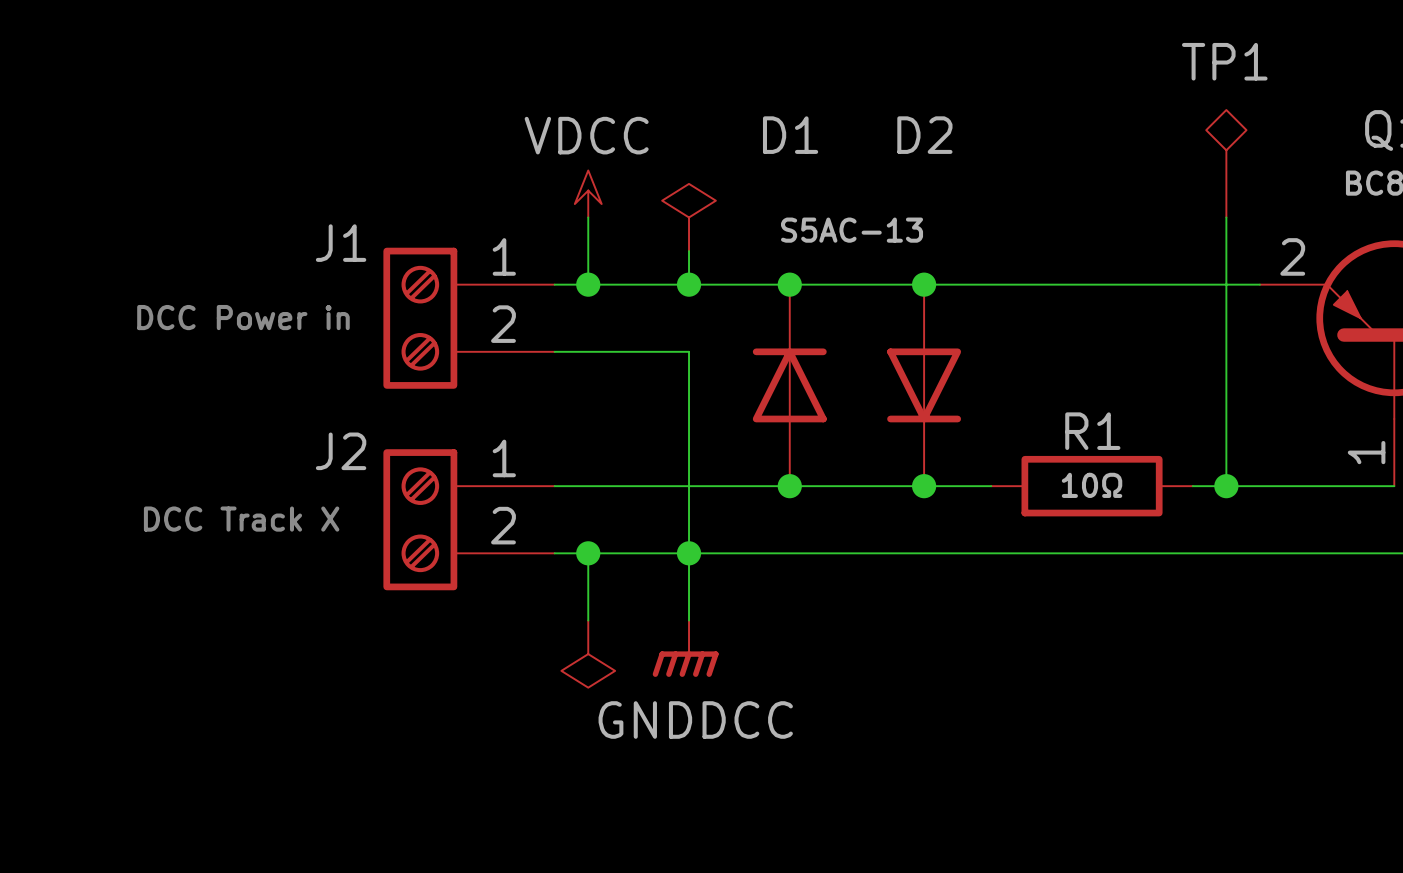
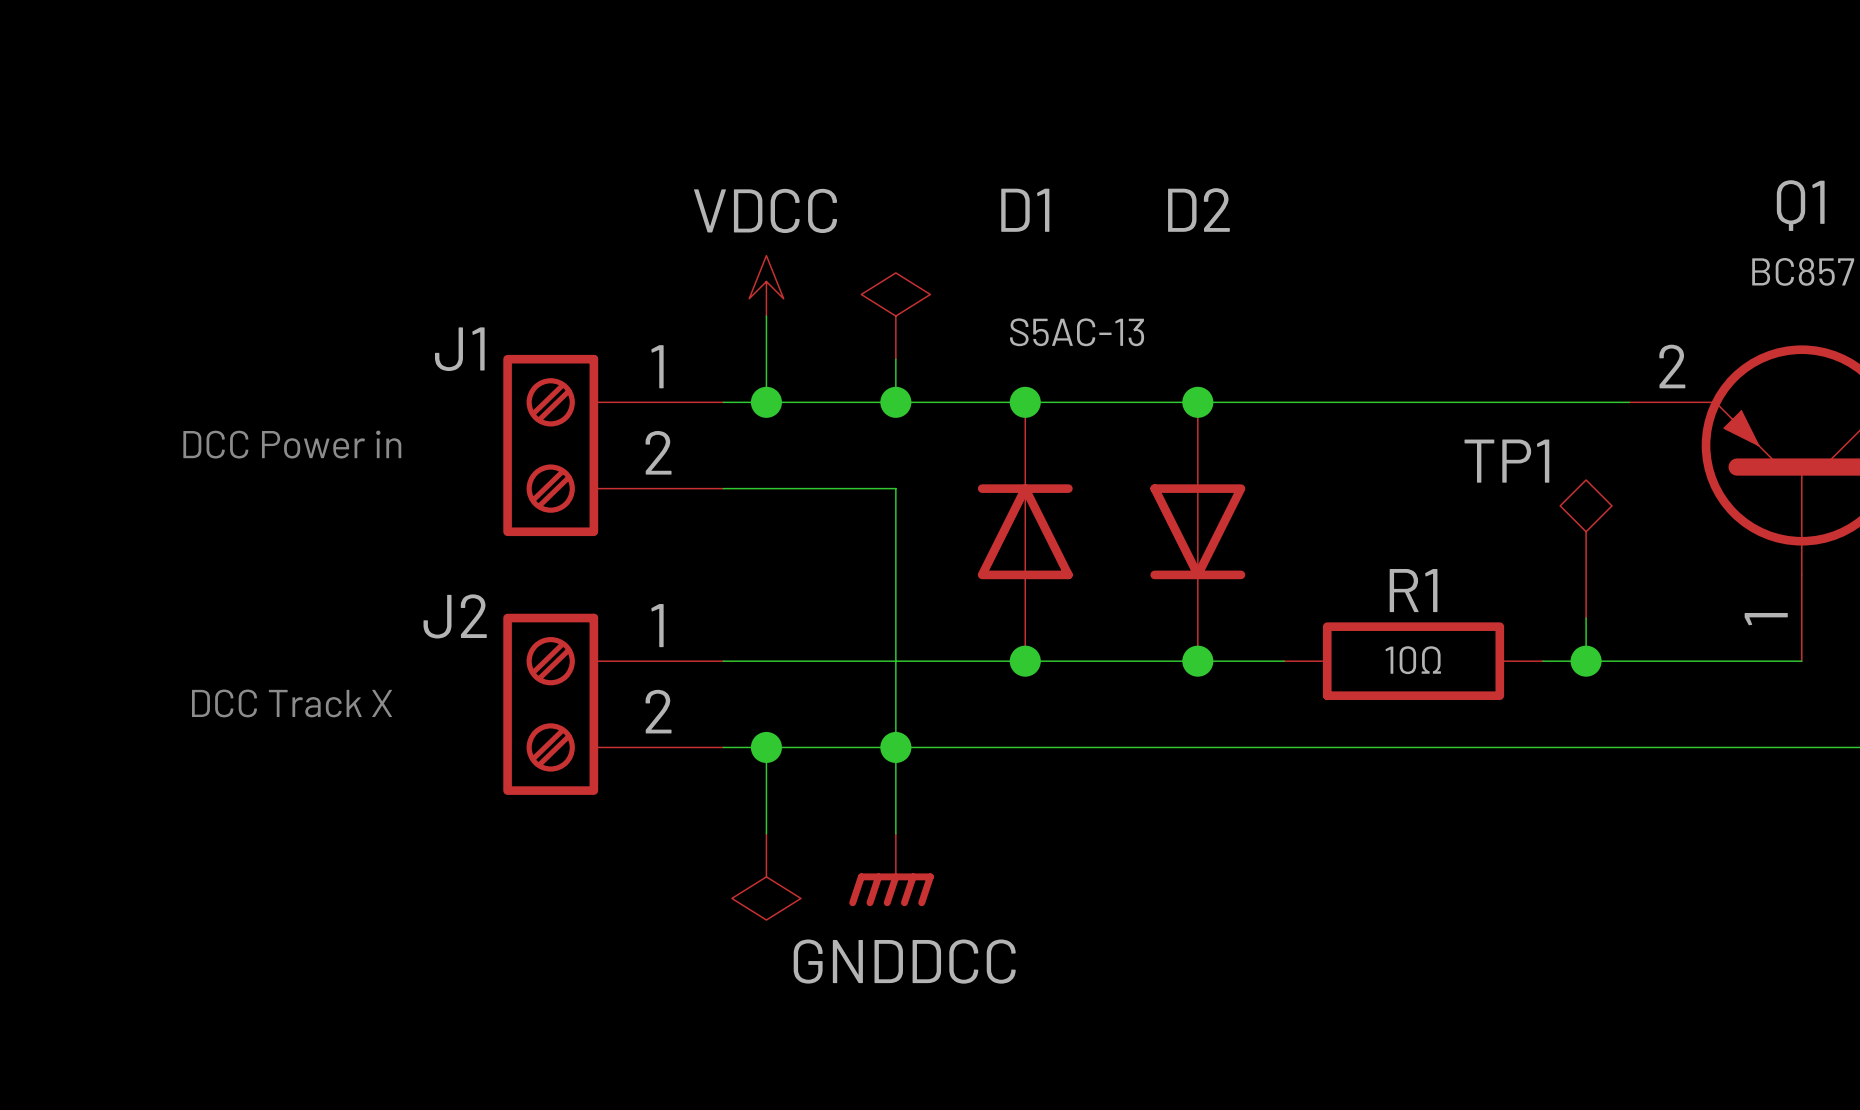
TP1 name position: TP1 (1224, 61) -> TP1 (1506, 461)
TP1 position: (1226, 163) -> (1586, 549)
wire: (1226, 217) (1226, 452) -> none

